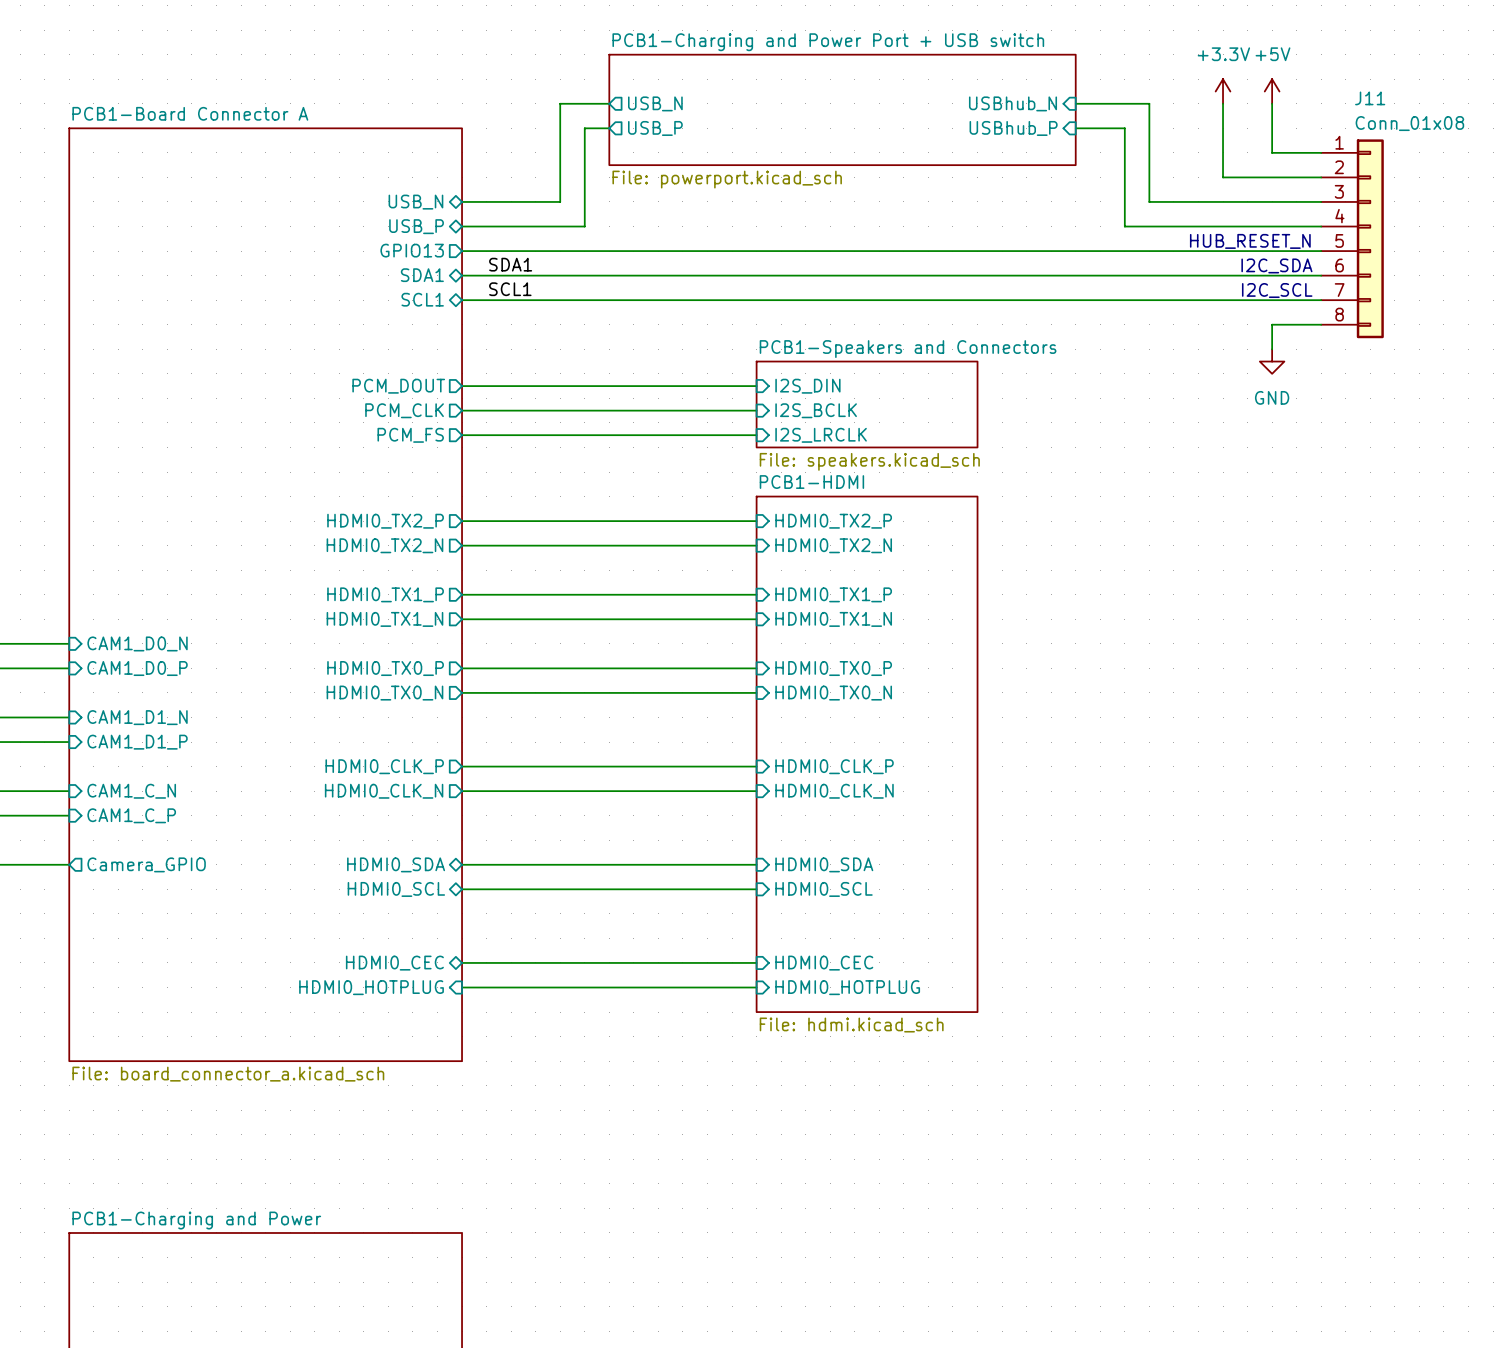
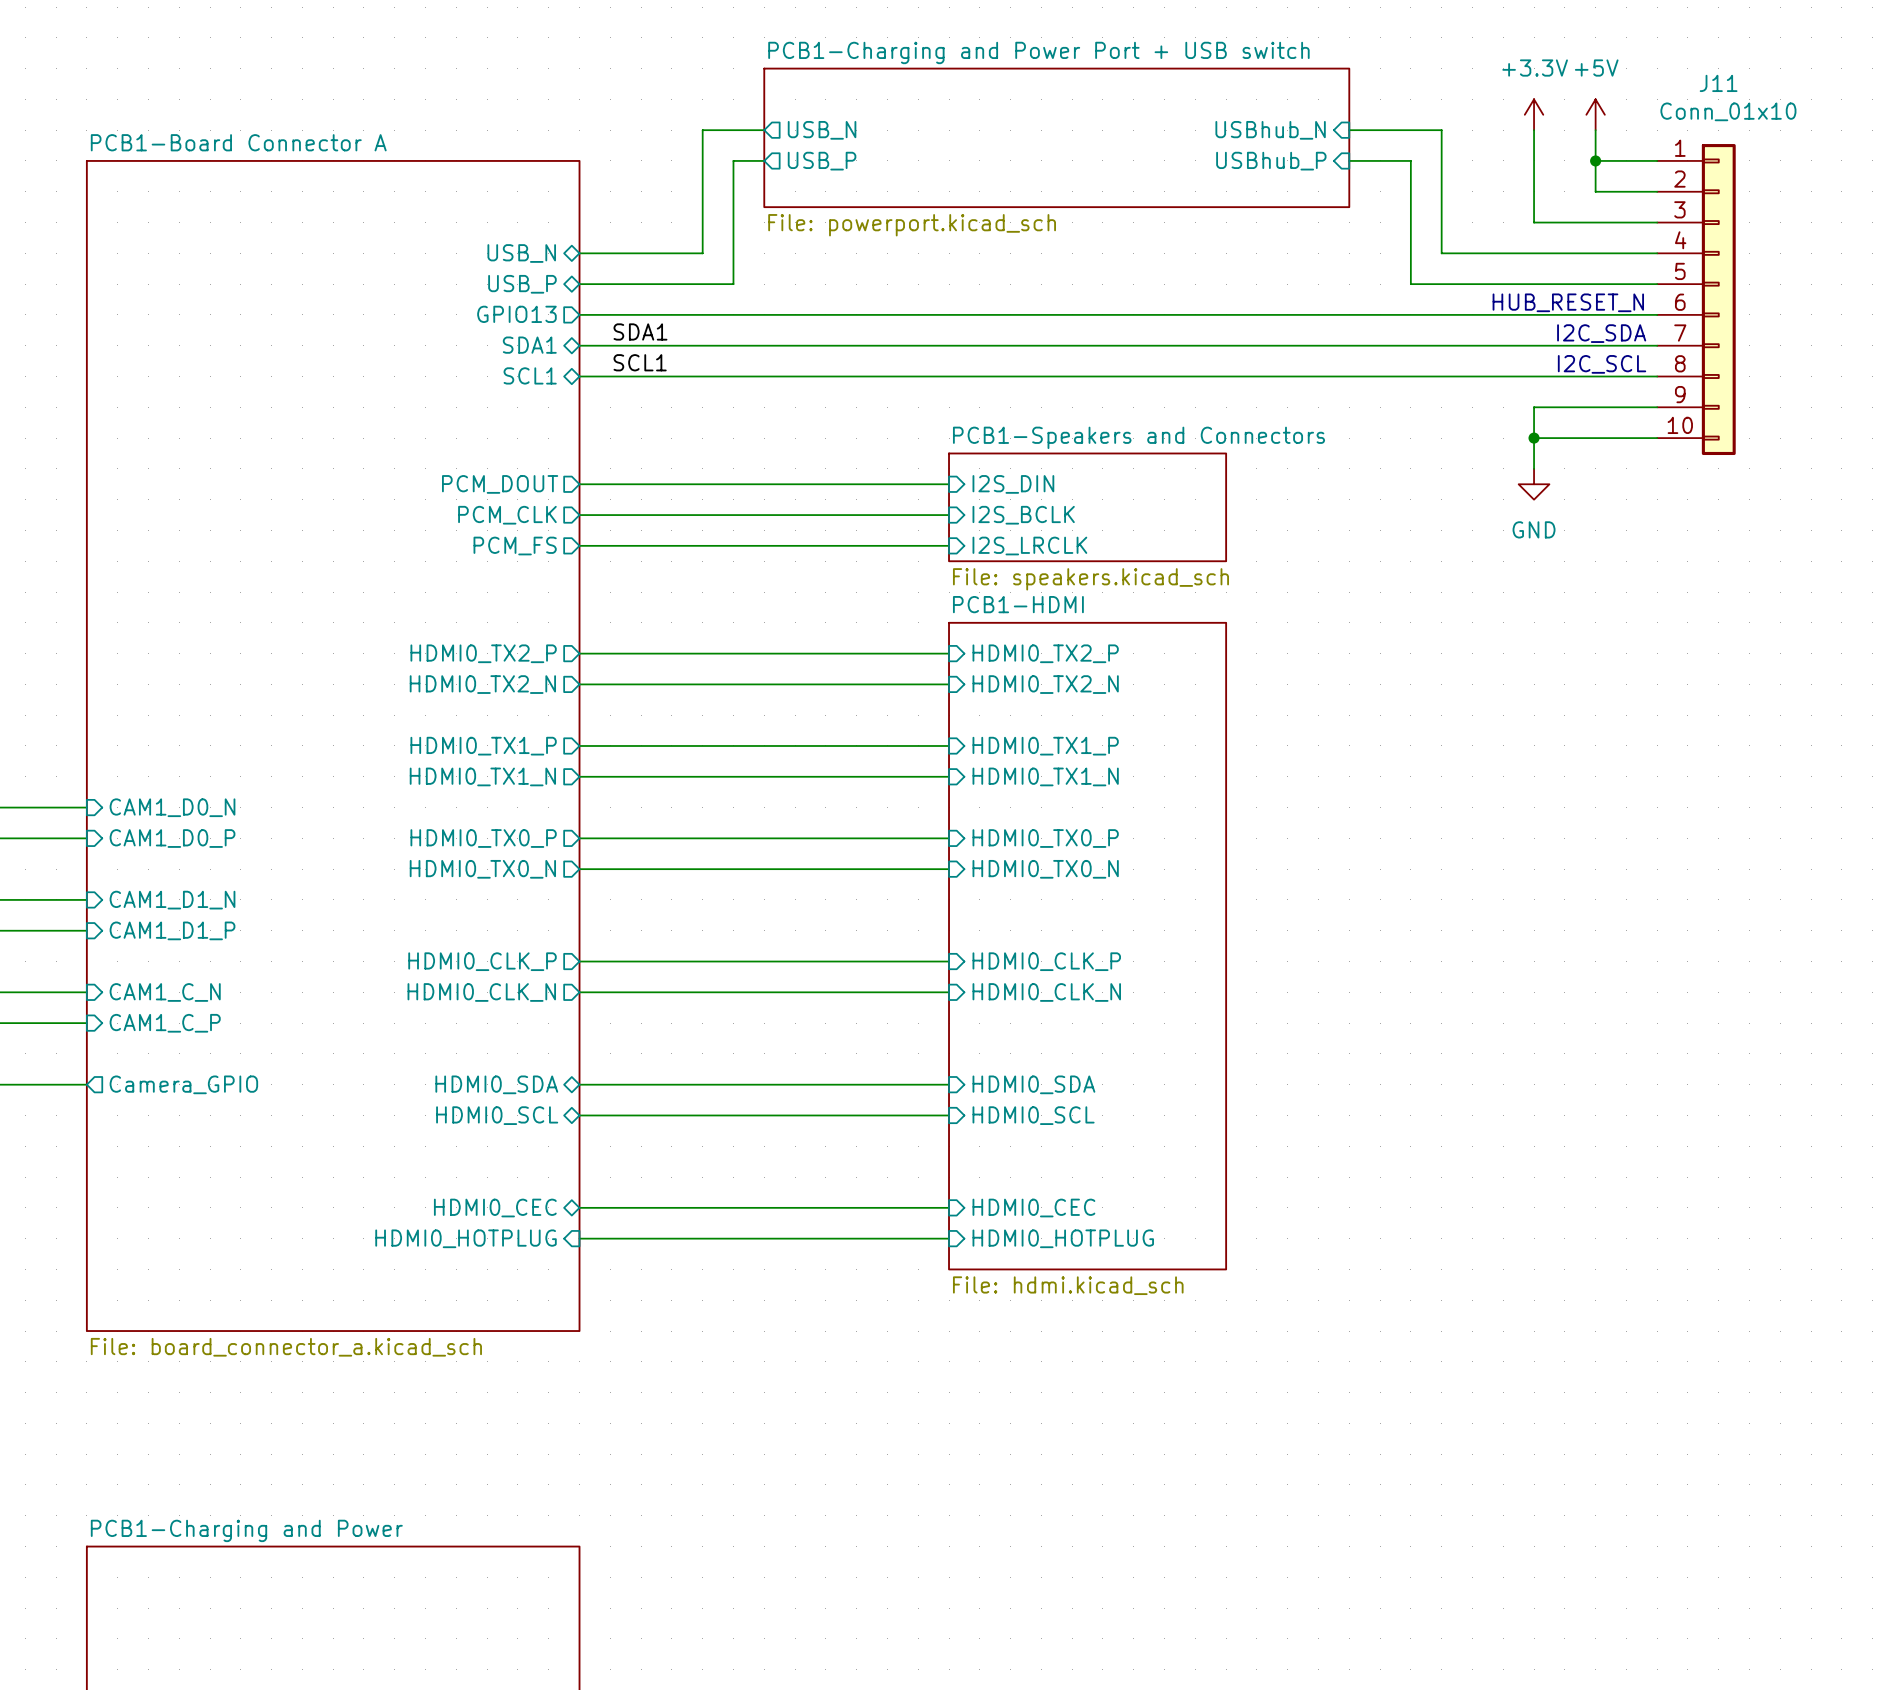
J11 name position: J11 (1370, 98) -> J11 (1718, 83)
J11 value: Conn_01x08 (1409, 123) -> Conn_01x10 (1728, 111)
wire: none -> (1595, 160) (1657, 160)
junction: none -> (1595, 160)
J11 symbol: [1321, 139, 1384, 339] -> [1657, 144, 1736, 456]
wire: (1272, 324) (1272, 349) -> (1595, 407) (1534, 407) (1534, 468)
wire: none -> (1534, 438) (1657, 438)
junction: none -> (1534, 438)
power symbol position: GND (1272, 361) -> GND (1534, 484)

